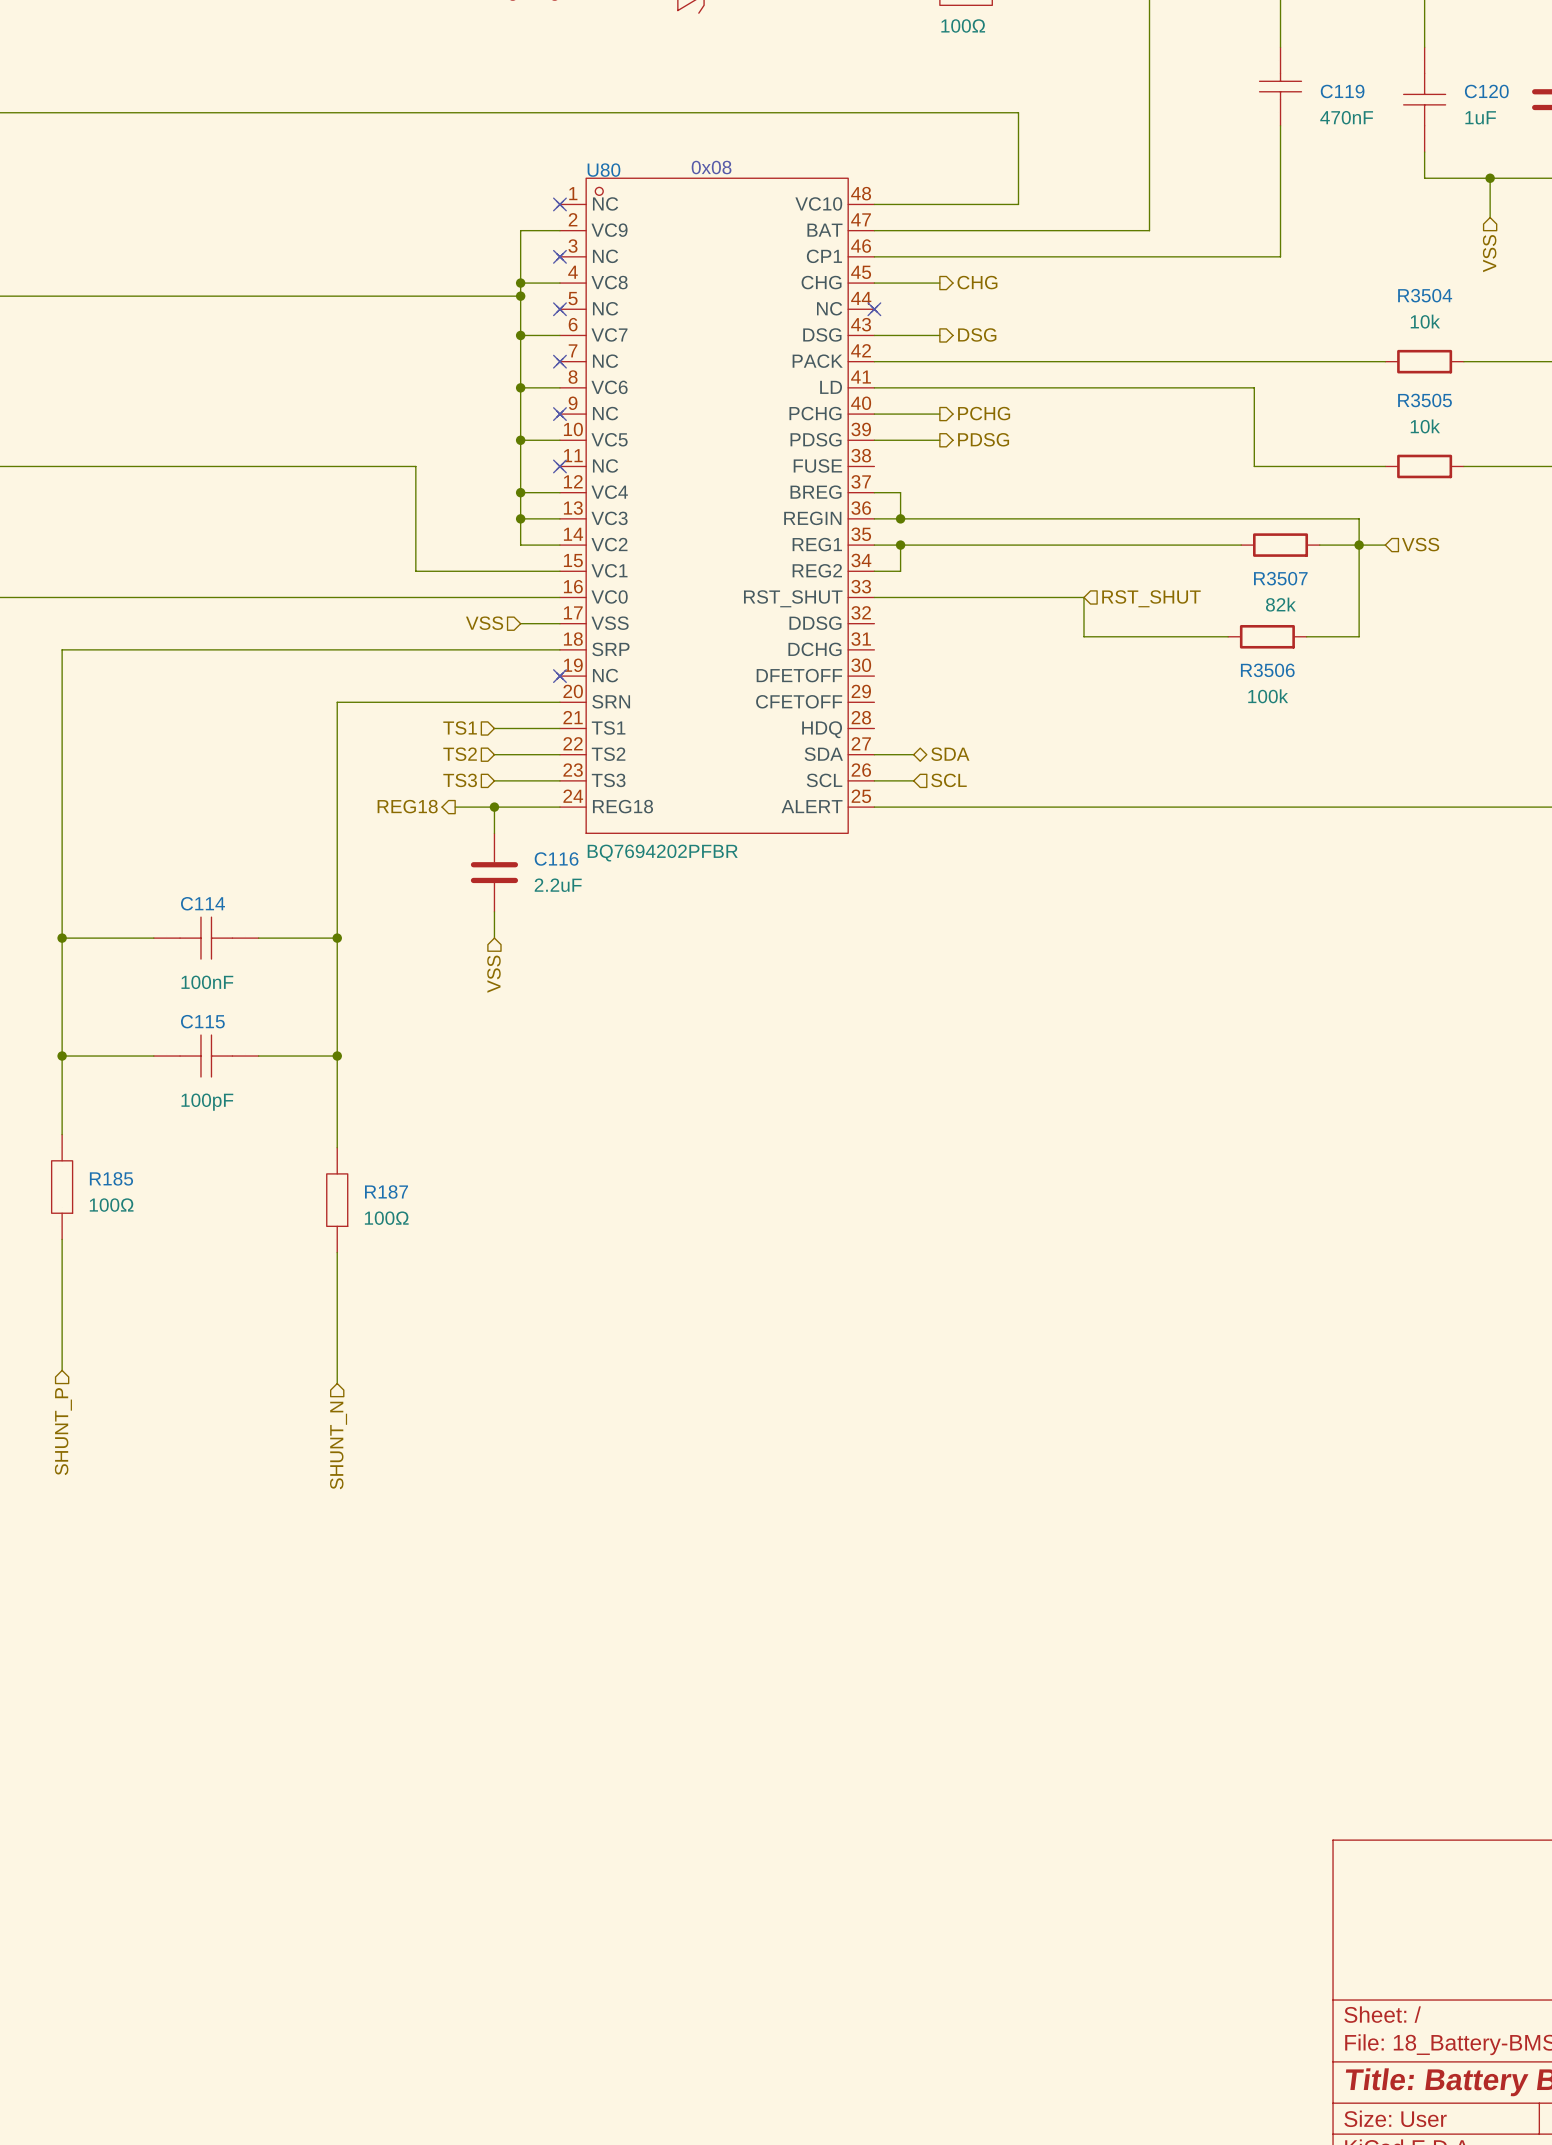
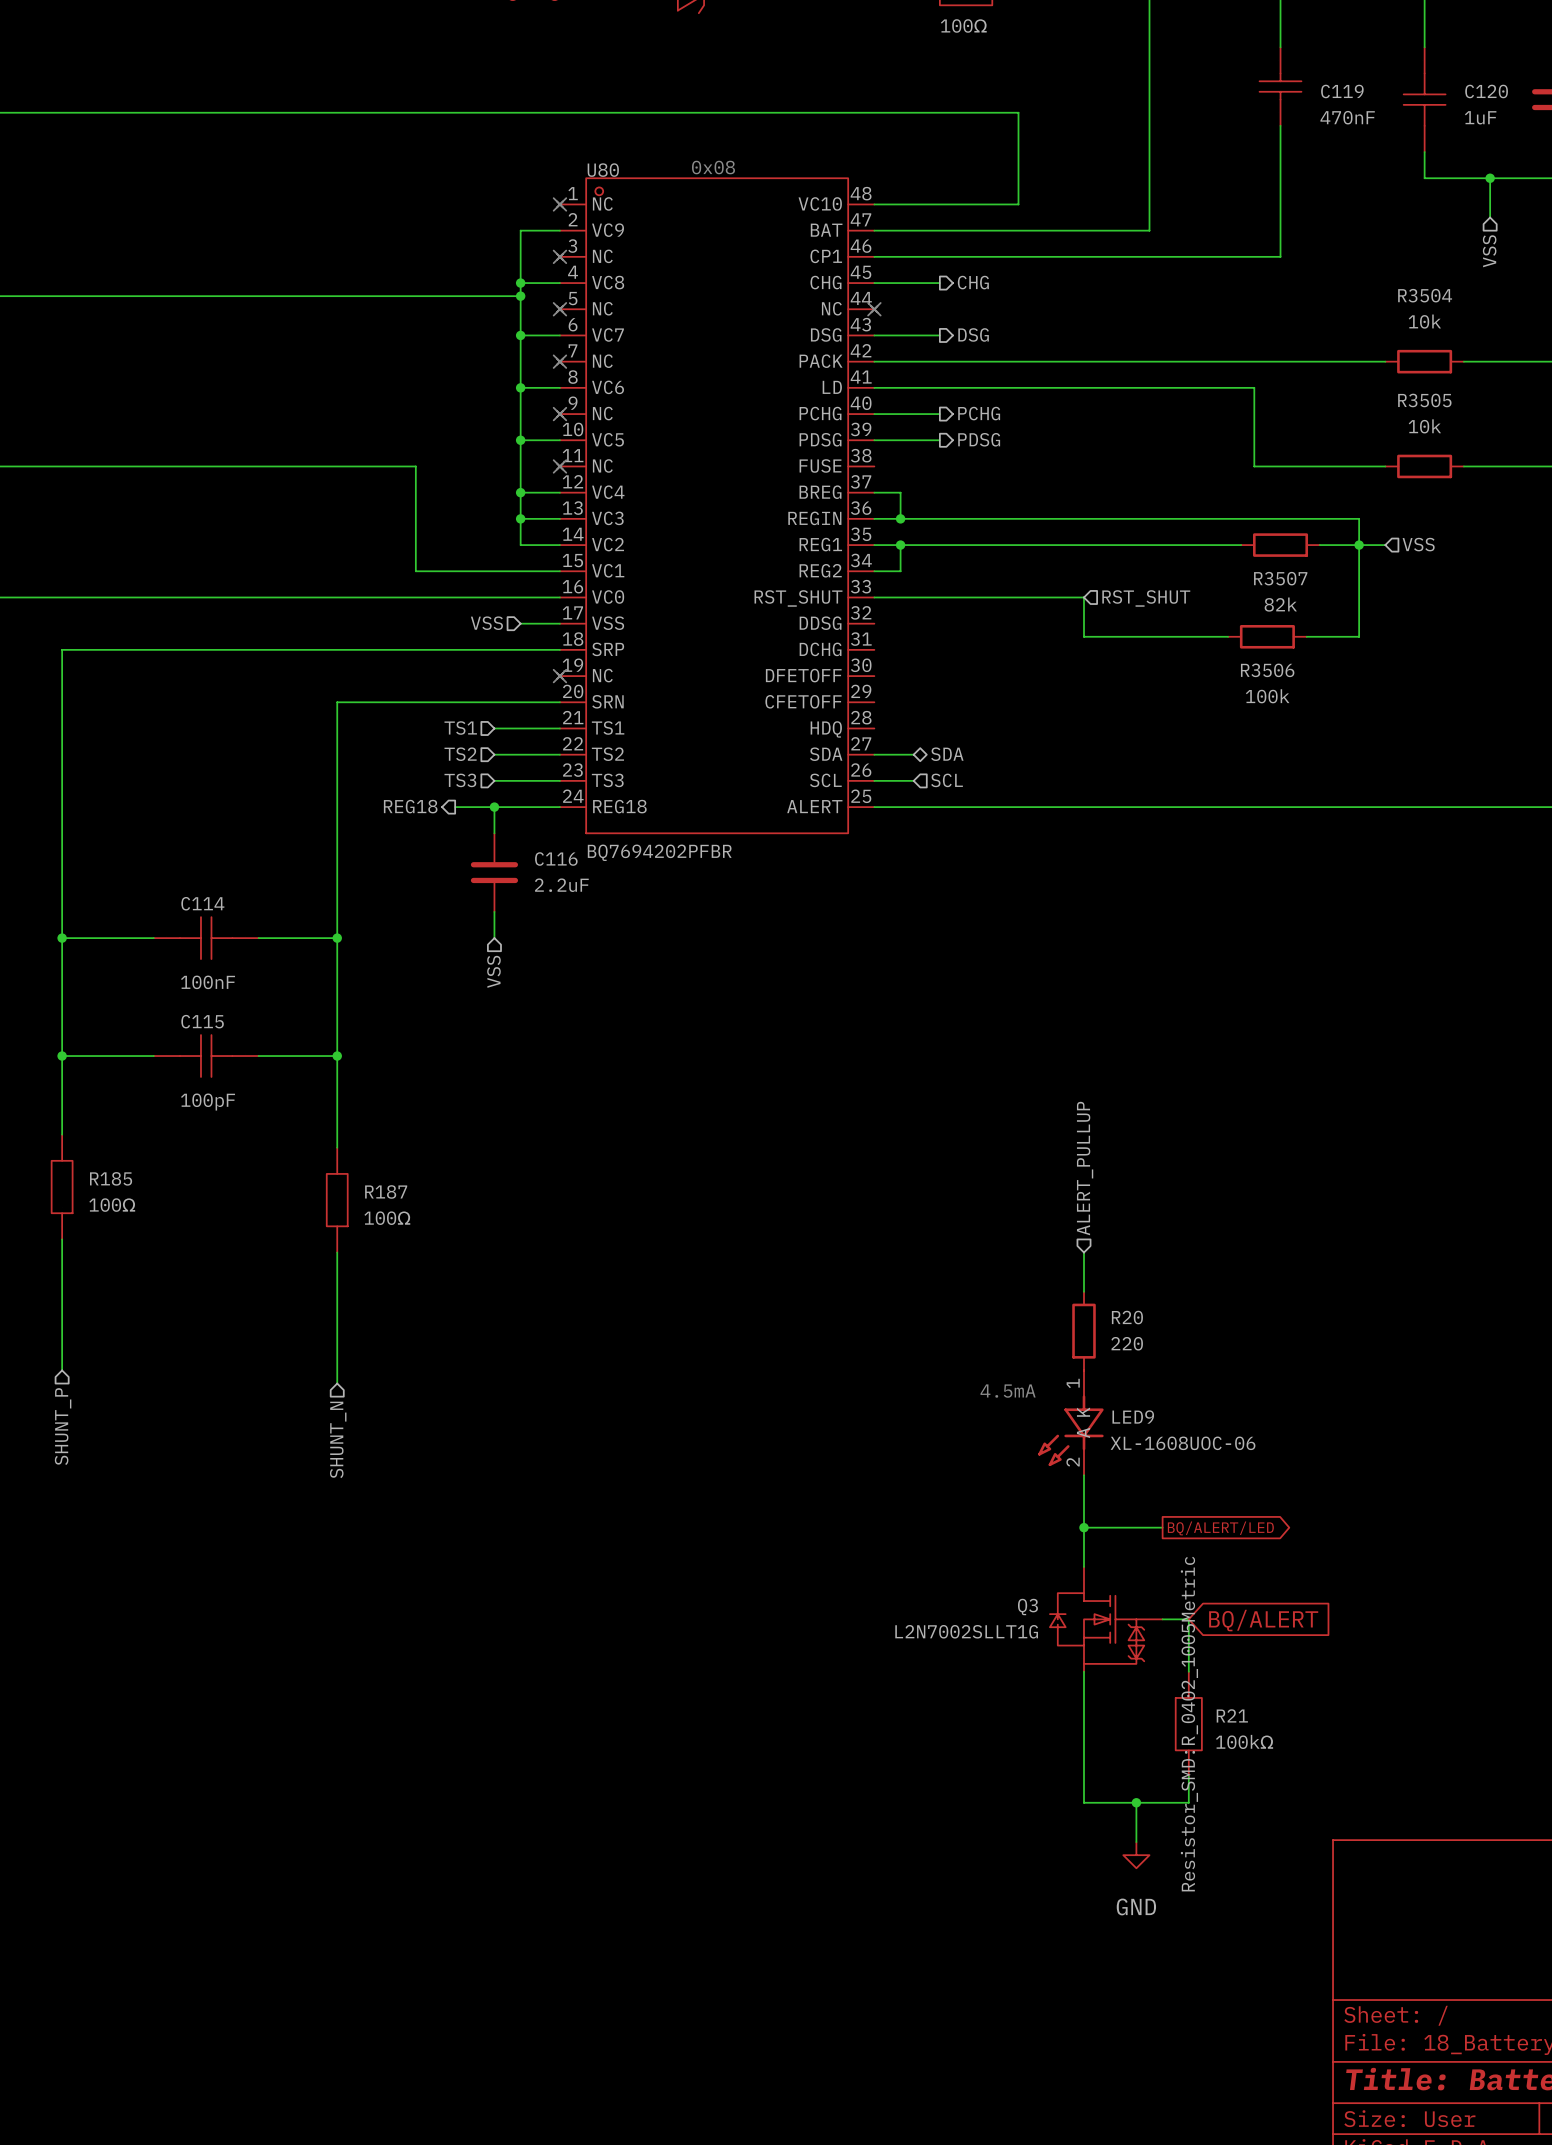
hierarchical label: none -> ALERT_PULLUP (1085, 1168)
wire: none -> (1084, 1252) (1084, 1291)
R20: none -> 220 (1084, 1331)
text: none -> 4.5mA (1008, 1391)
LED9: none -> XL-1608UOC-06 (1070, 1422)
wire: none -> (1084, 1475) (1084, 1566)
wire: none -> (1084, 1527) (1162, 1527)
junction: none -> (1084, 1527)
global label: none -> BQ/ALERT/LED (1220, 1528)
Q3: none -> L2N7002SLLT1G (1106, 1619)
wire: none -> (1162, 1619) (1188, 1619) (1188, 1671)
global label: none -> BQ/ALERT (1263, 1620)
wire: none -> (1084, 1671) (1084, 1802) (1188, 1802) (1188, 1776)
R21: none -> 100kΩ (1188, 1724)
wire: none -> (1136, 1802) (1136, 1842)
junction: none -> (1136, 1802)
power symbol: none -> GND (1136, 1855)

